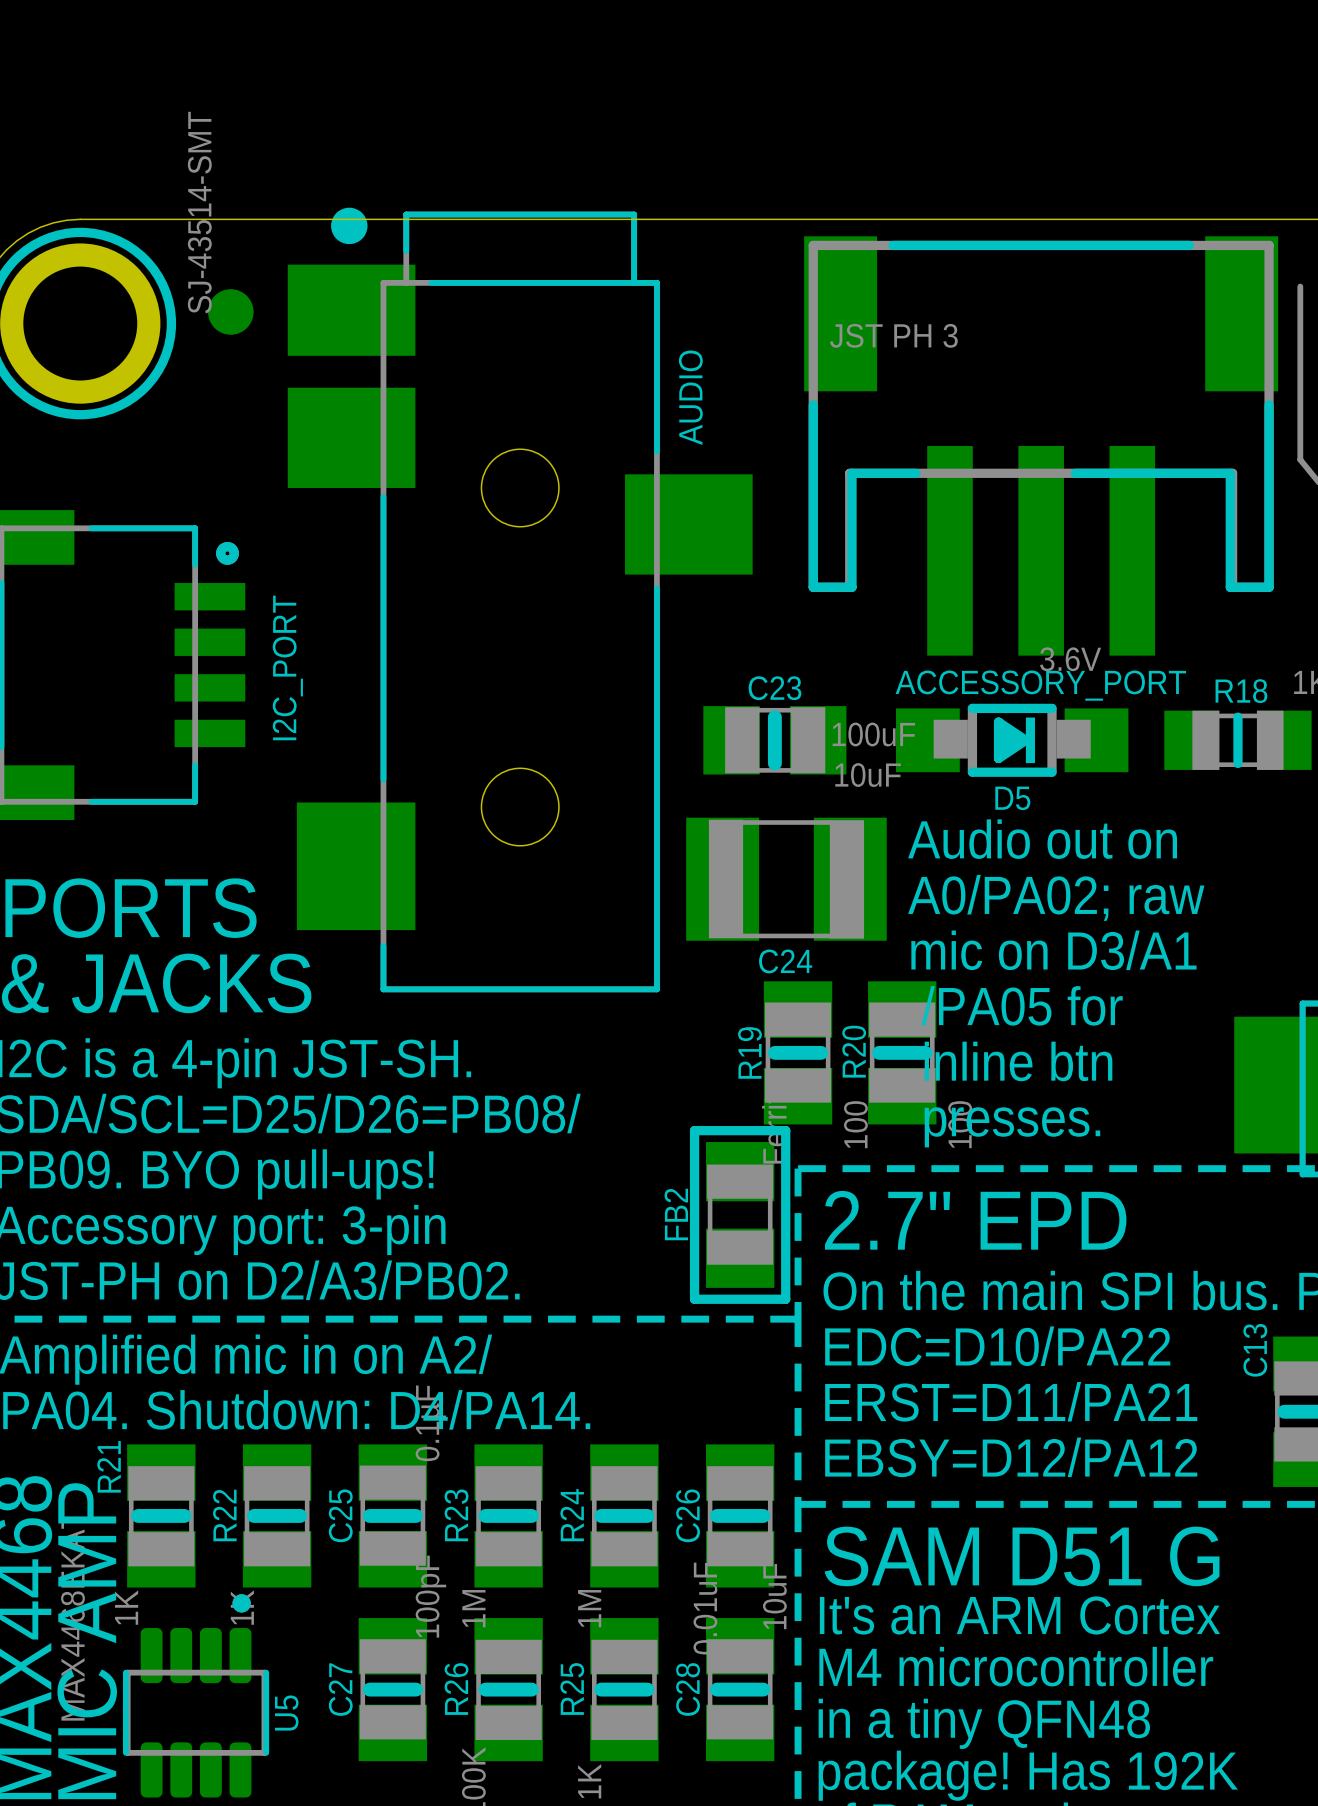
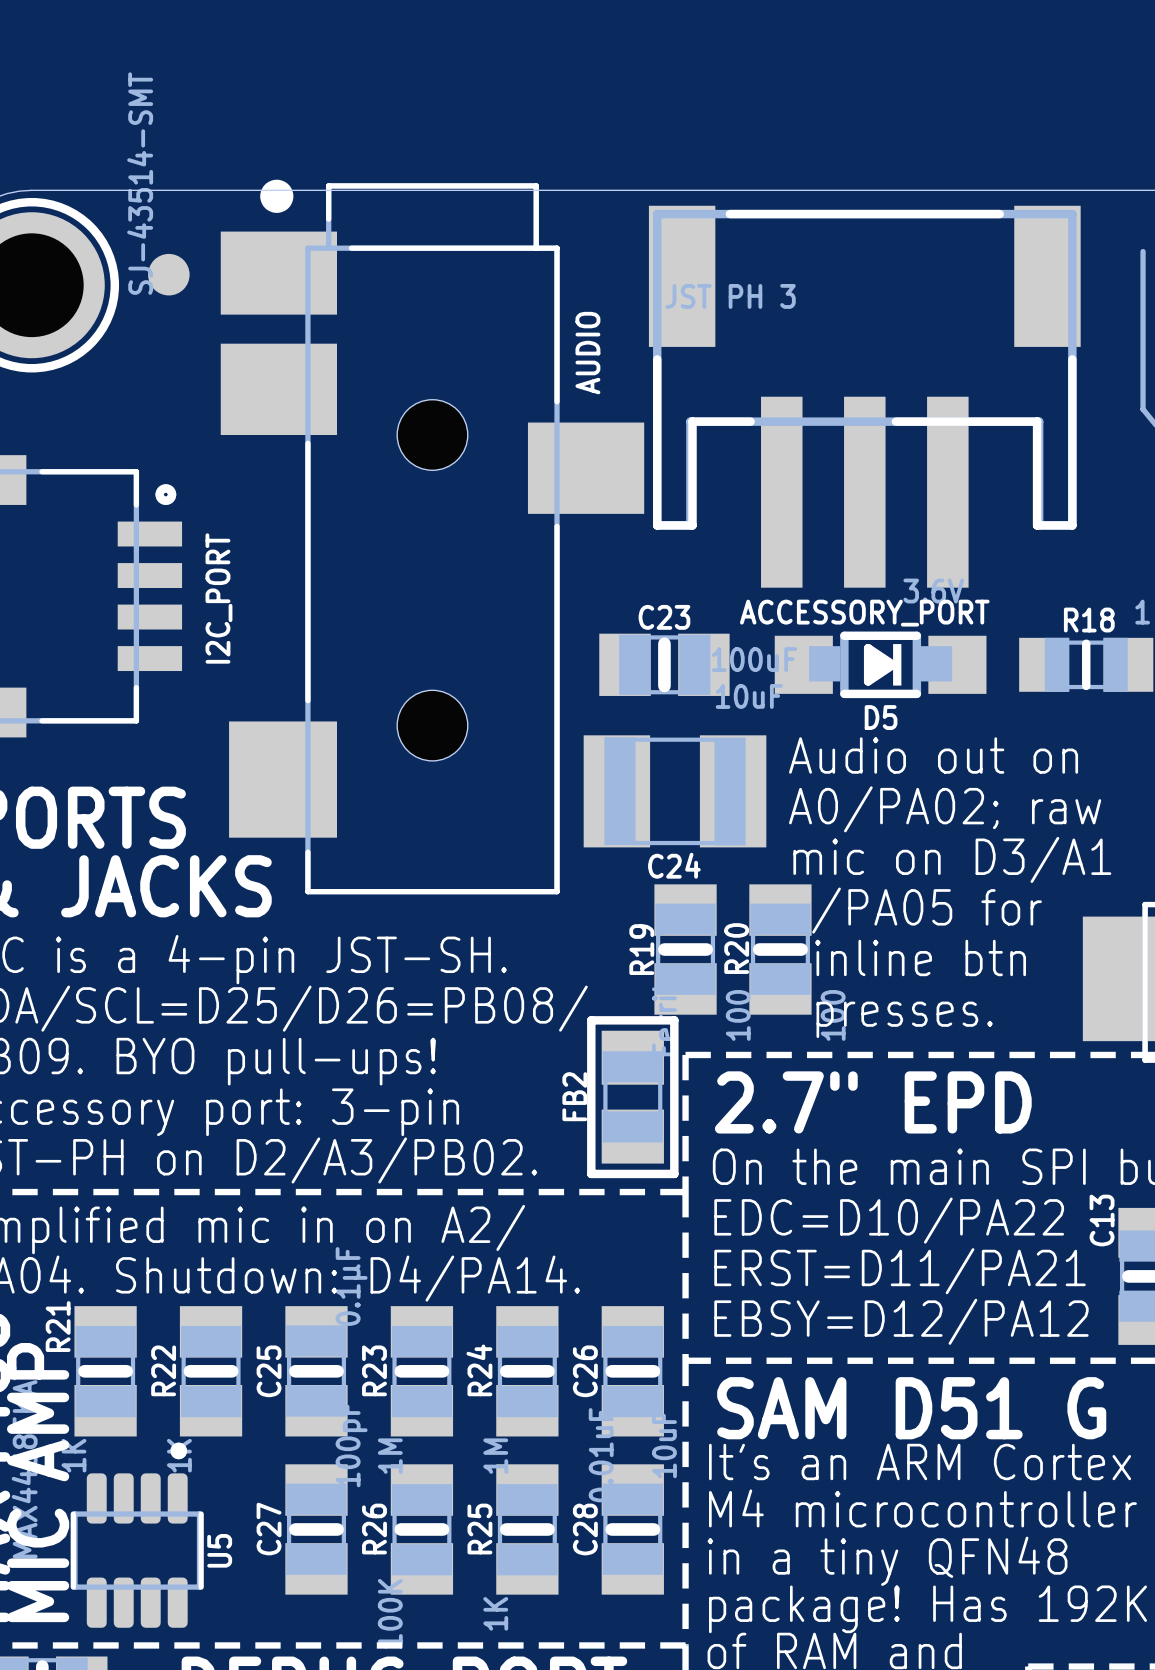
ACCESSORY_PORT position: (1041, 445) -> (864, 396)

